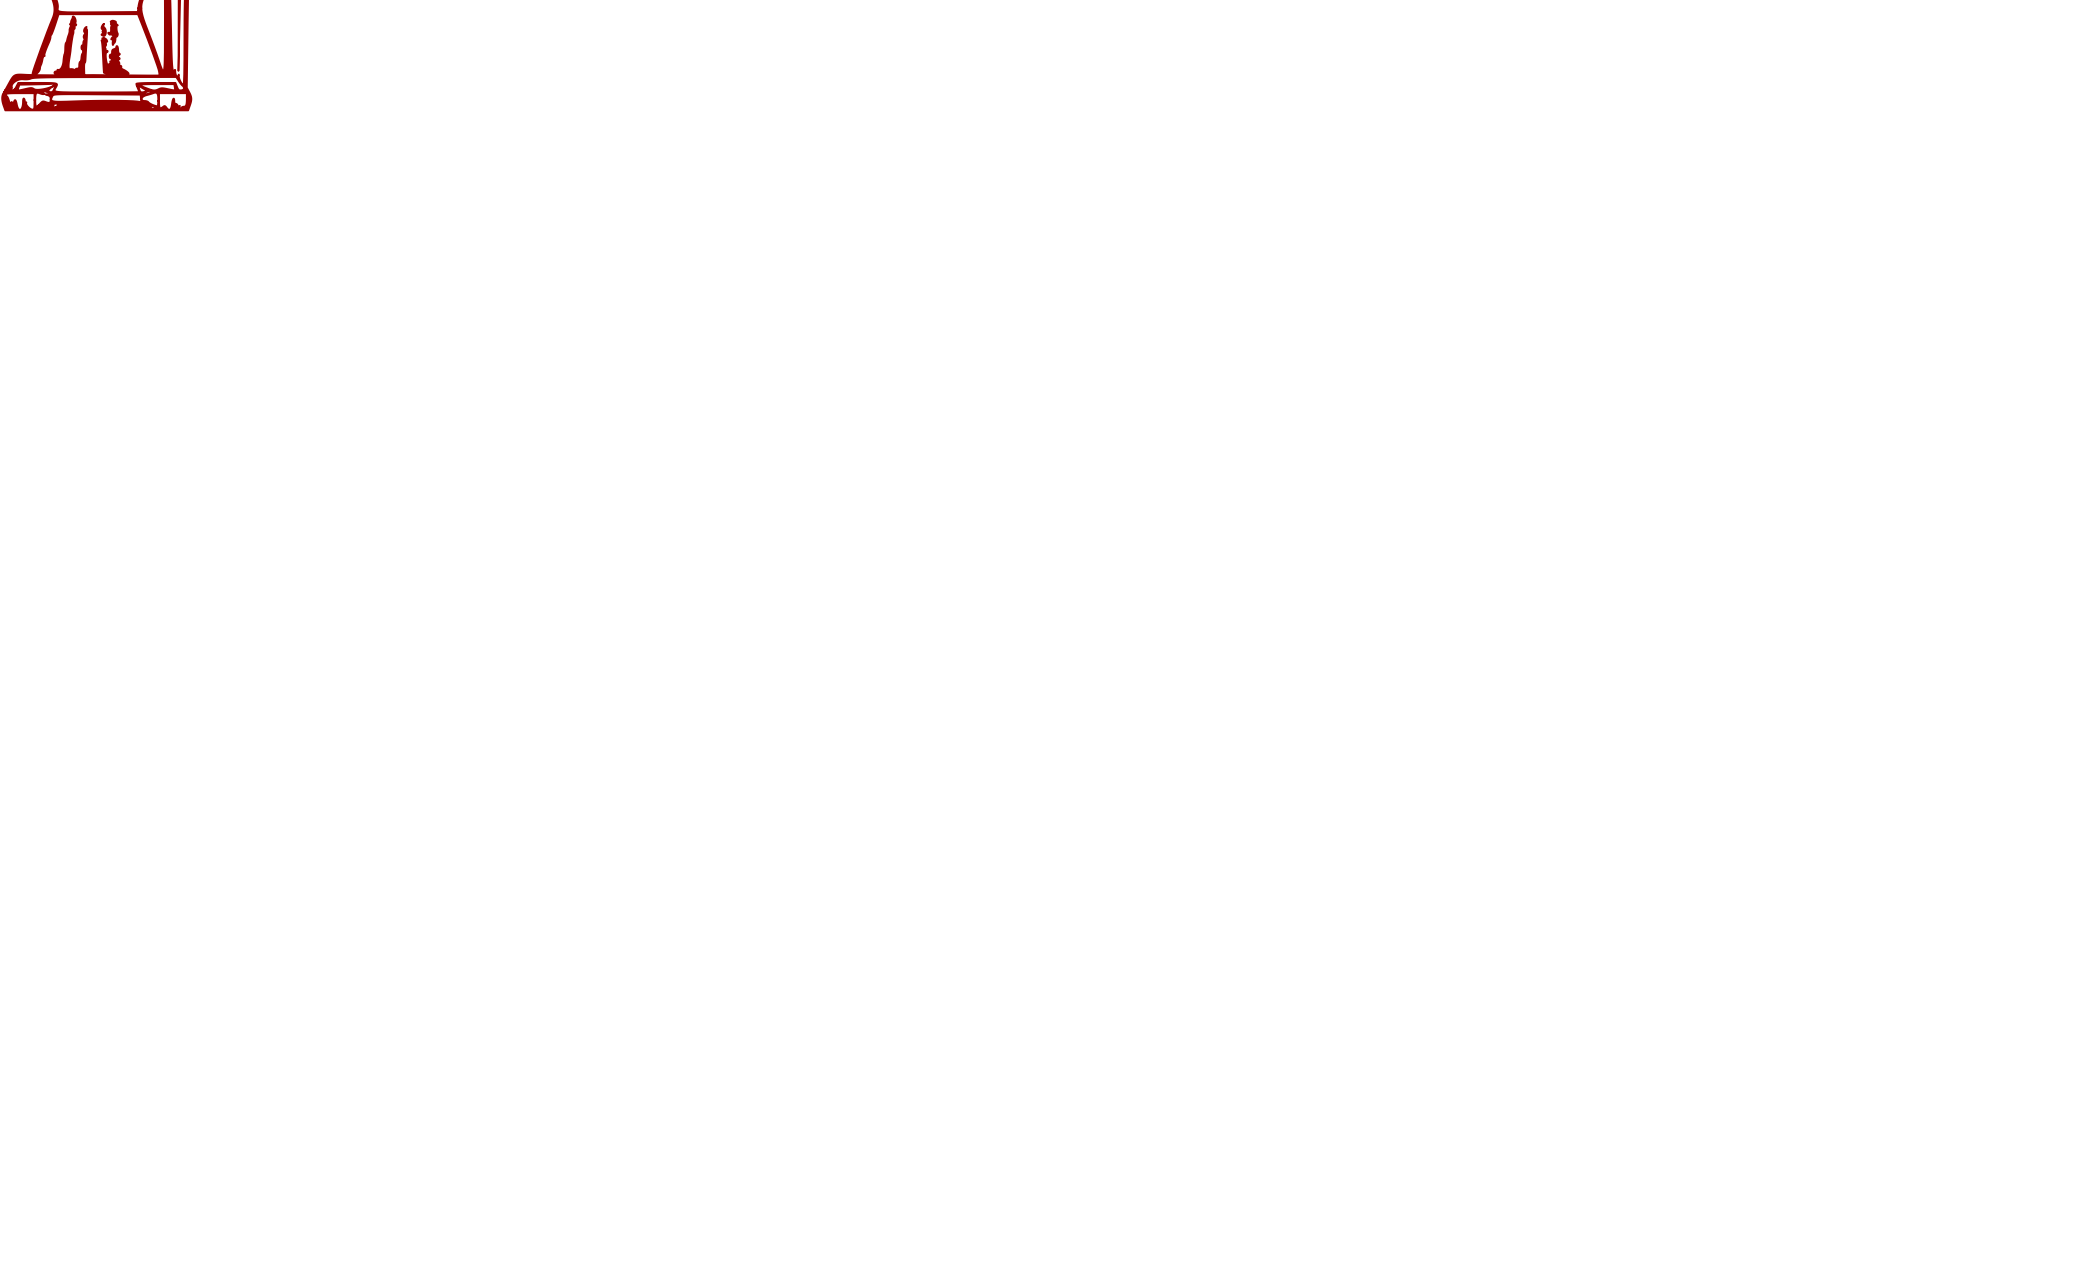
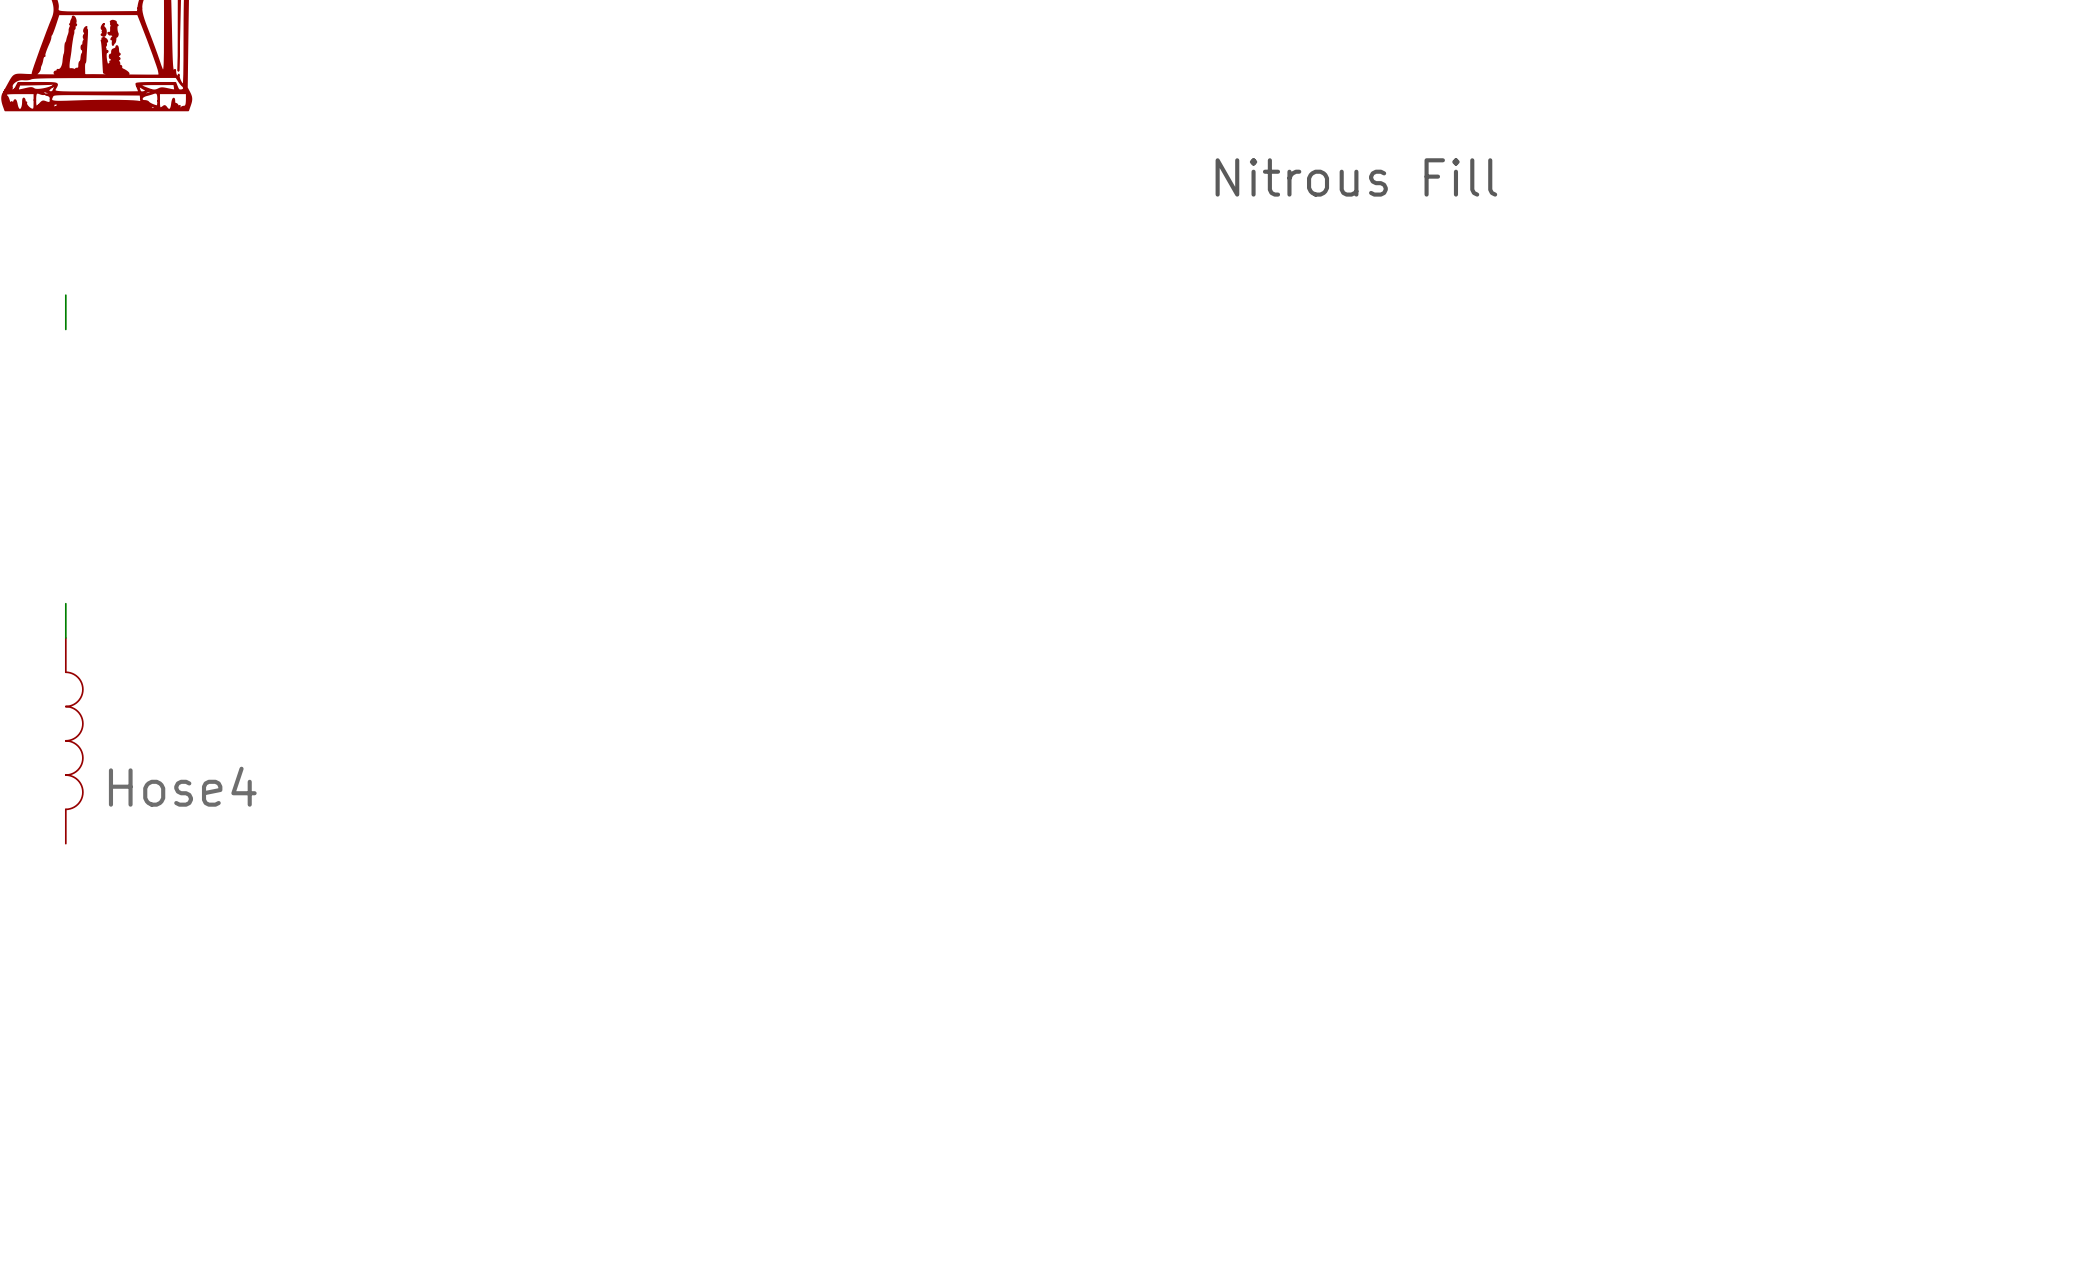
text: none -> Nitrous Fill (1356, 177)
wire: none -> (65, 295) (65, 329)
wire: none -> (65, 603) (65, 637)
Hose4: none -> (74, 740)

